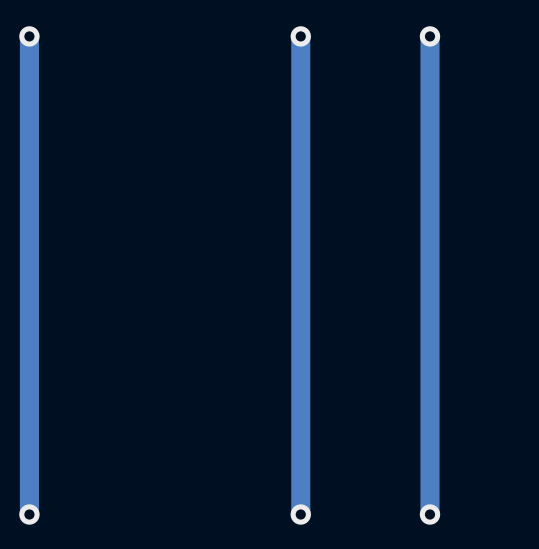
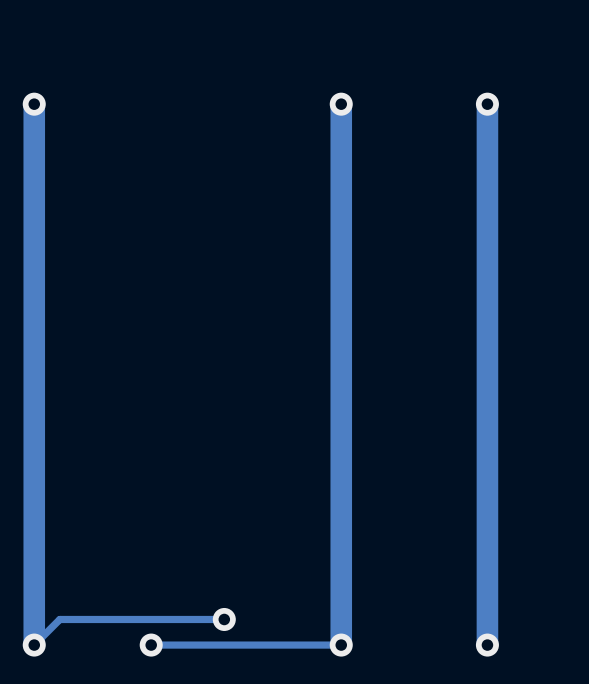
track: none -> (224, 619) (59, 619) (34, 645)
via: none -> (224, 619)
via: none -> (151, 645)
track: none -> (341, 645) (151, 645)

